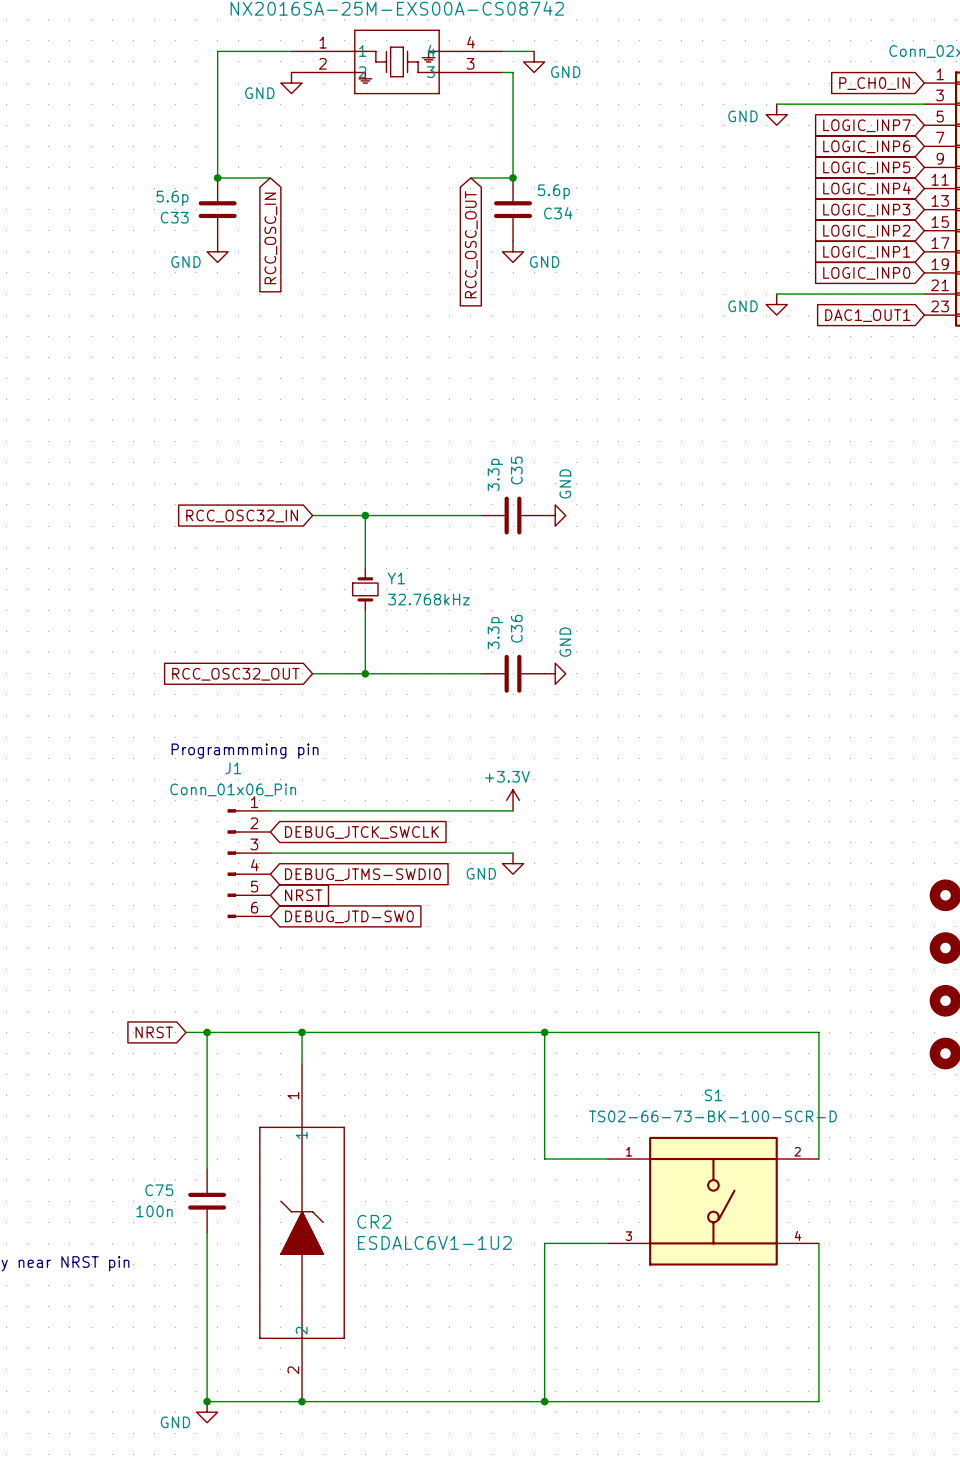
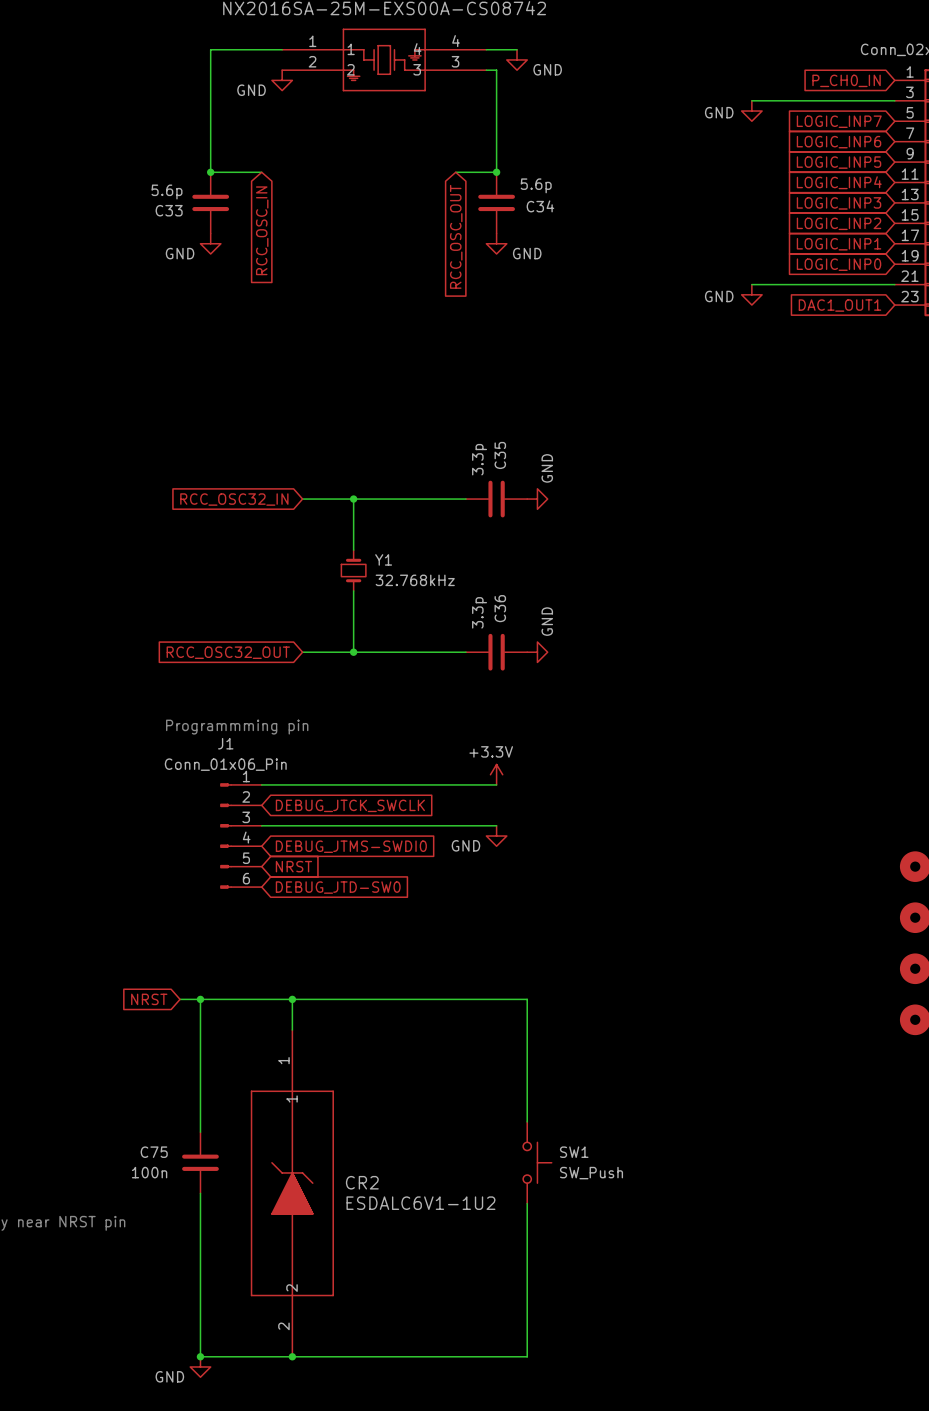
wire: (544, 1032) (818, 1032) (818, 1159) -> none
junction: (544, 1032) -> none
wire: (544, 1159) (607, 1159) -> none
SW1: none -> SW_Push (537, 1162)
S1: TS02-66-73-BK-100-SCR-D (713, 1201) -> none
wire: (544, 1243) (607, 1243) -> none
wire: (818, 1243) (818, 1401) (544, 1401) -> none
junction: (544, 1401) -> none

